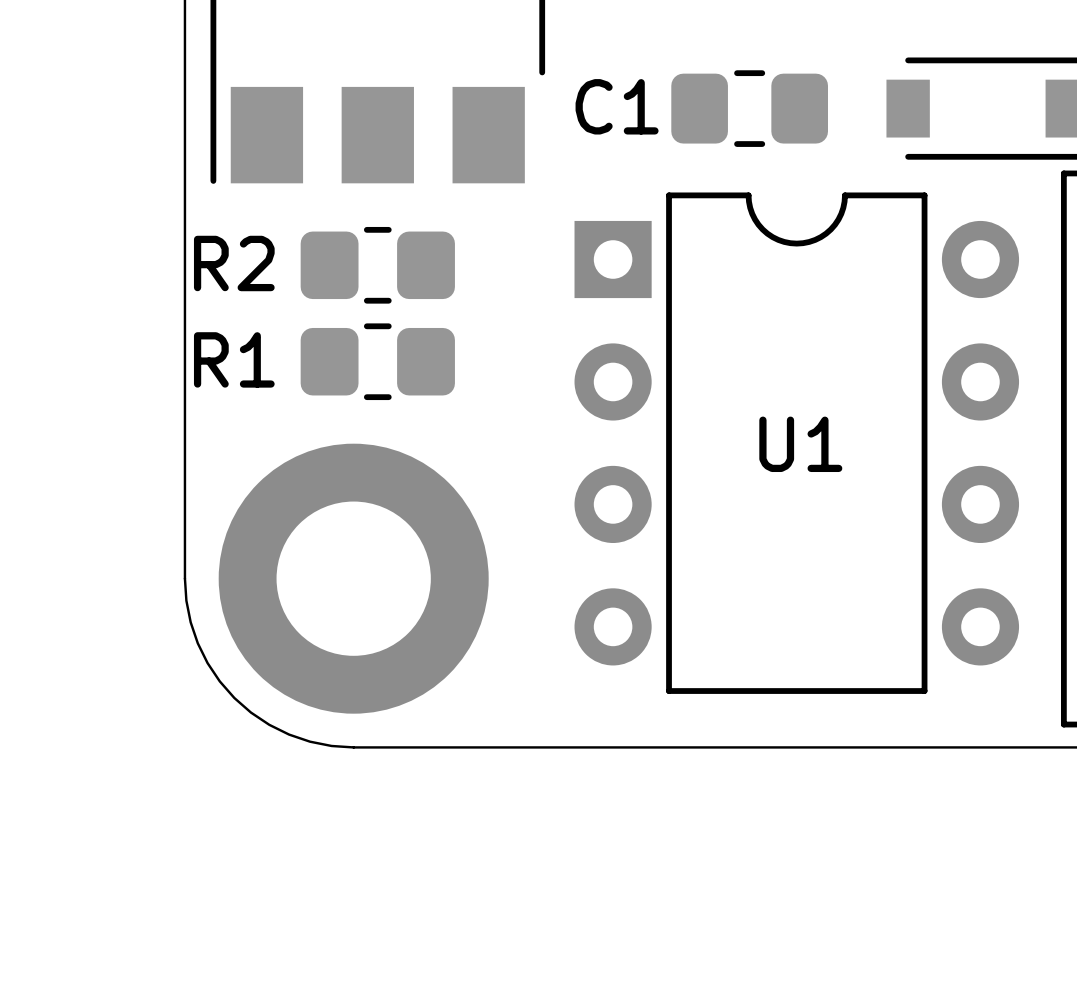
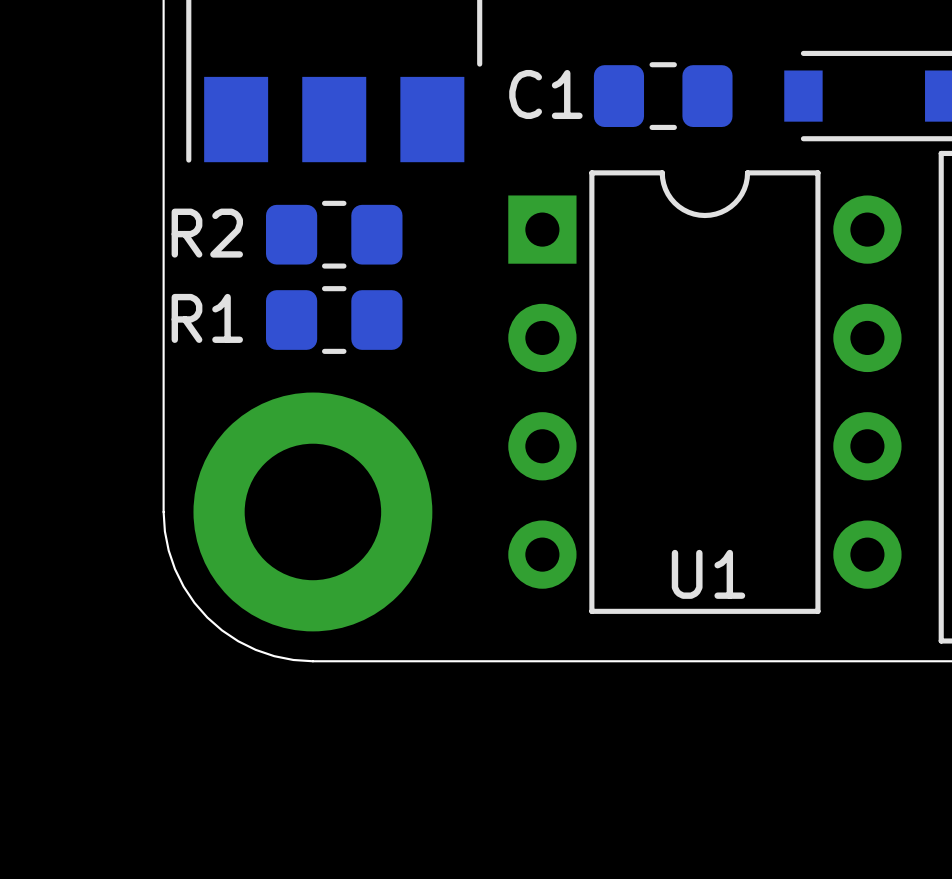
U1 name position: U1 (800, 444) -> U1 (708, 574)

